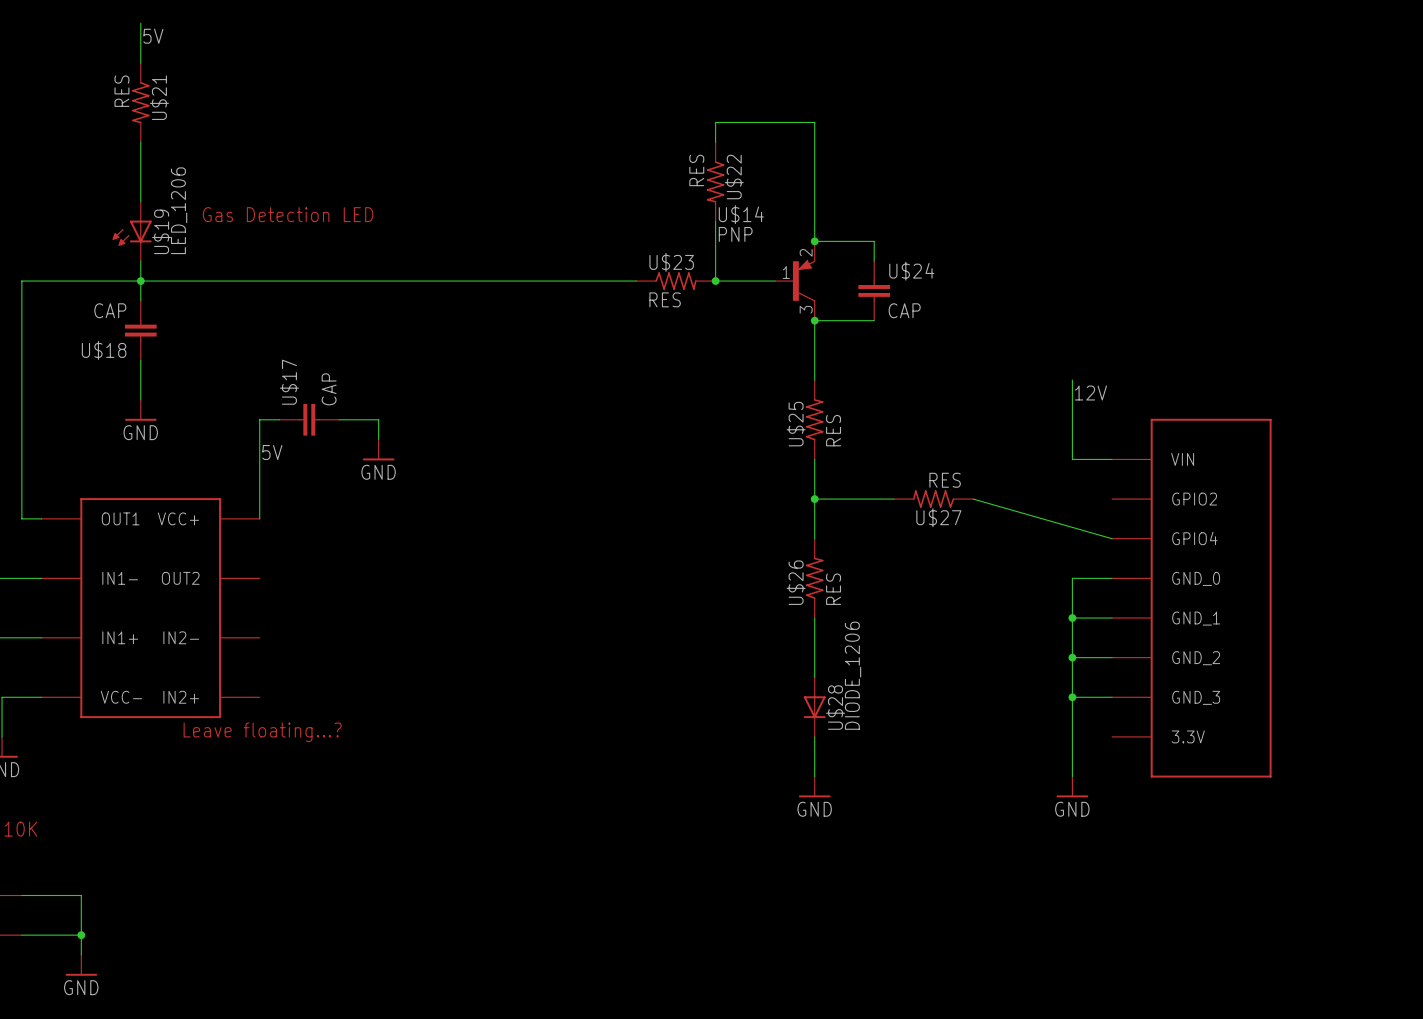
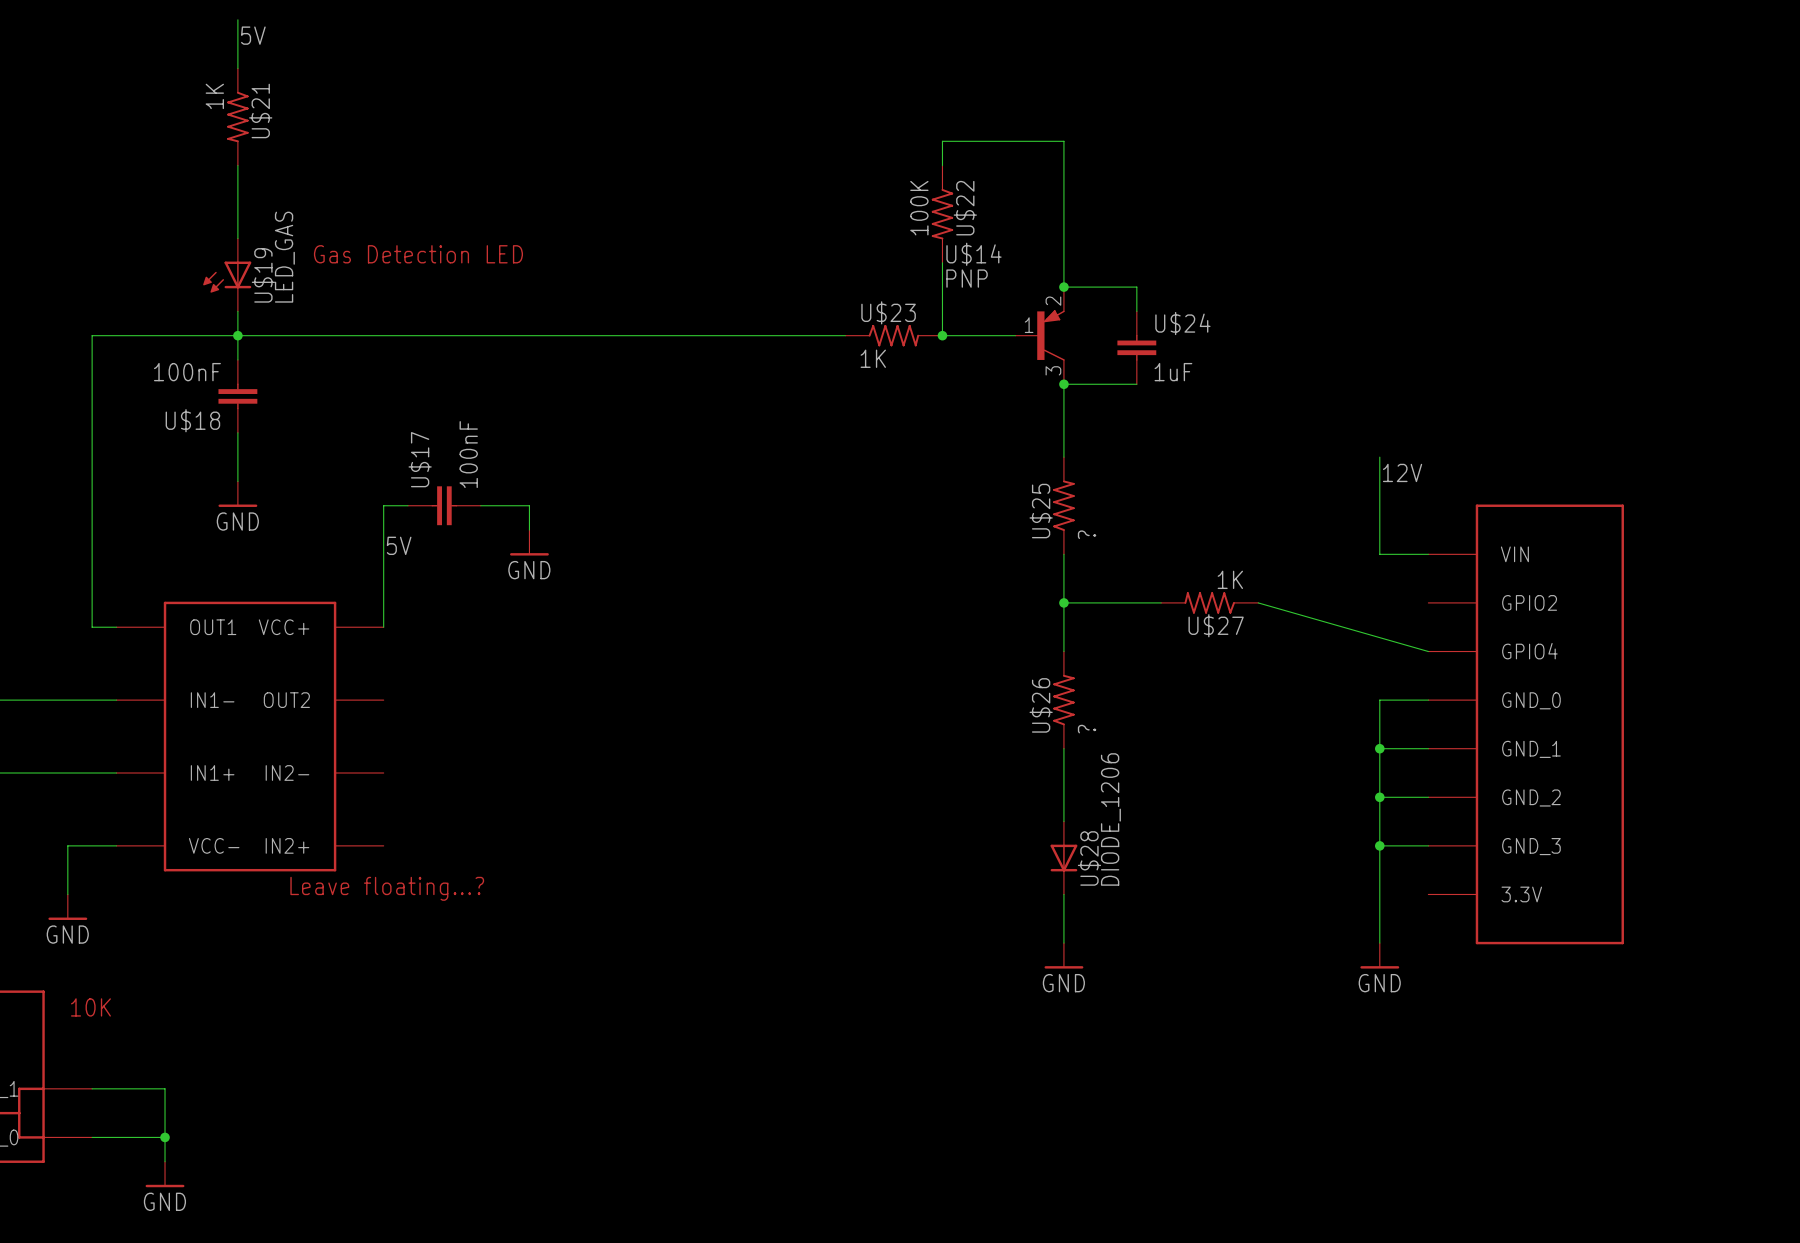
U$21 value: RES (121, 91) -> 1K (214, 96)
U$22 value: RES (696, 170) -> 100K (919, 208)
U$19 value: LED_1206 (179, 210) -> LED_GAS (284, 257)
U$23 value: RES (665, 299) -> 1K (873, 358)
U$18 value: CAP (110, 310) -> 100nF (187, 372)
U$24 value: CAP (904, 310) -> 1uF (1173, 372)
U$17 value: CAP (329, 389) -> 100nF (468, 454)
U$25 value: RES (833, 430) -> ? (1087, 534)
U$27 value: RES (945, 480) -> 1K (1230, 579)
U$26 value: RES (833, 589) -> ? (1087, 729)

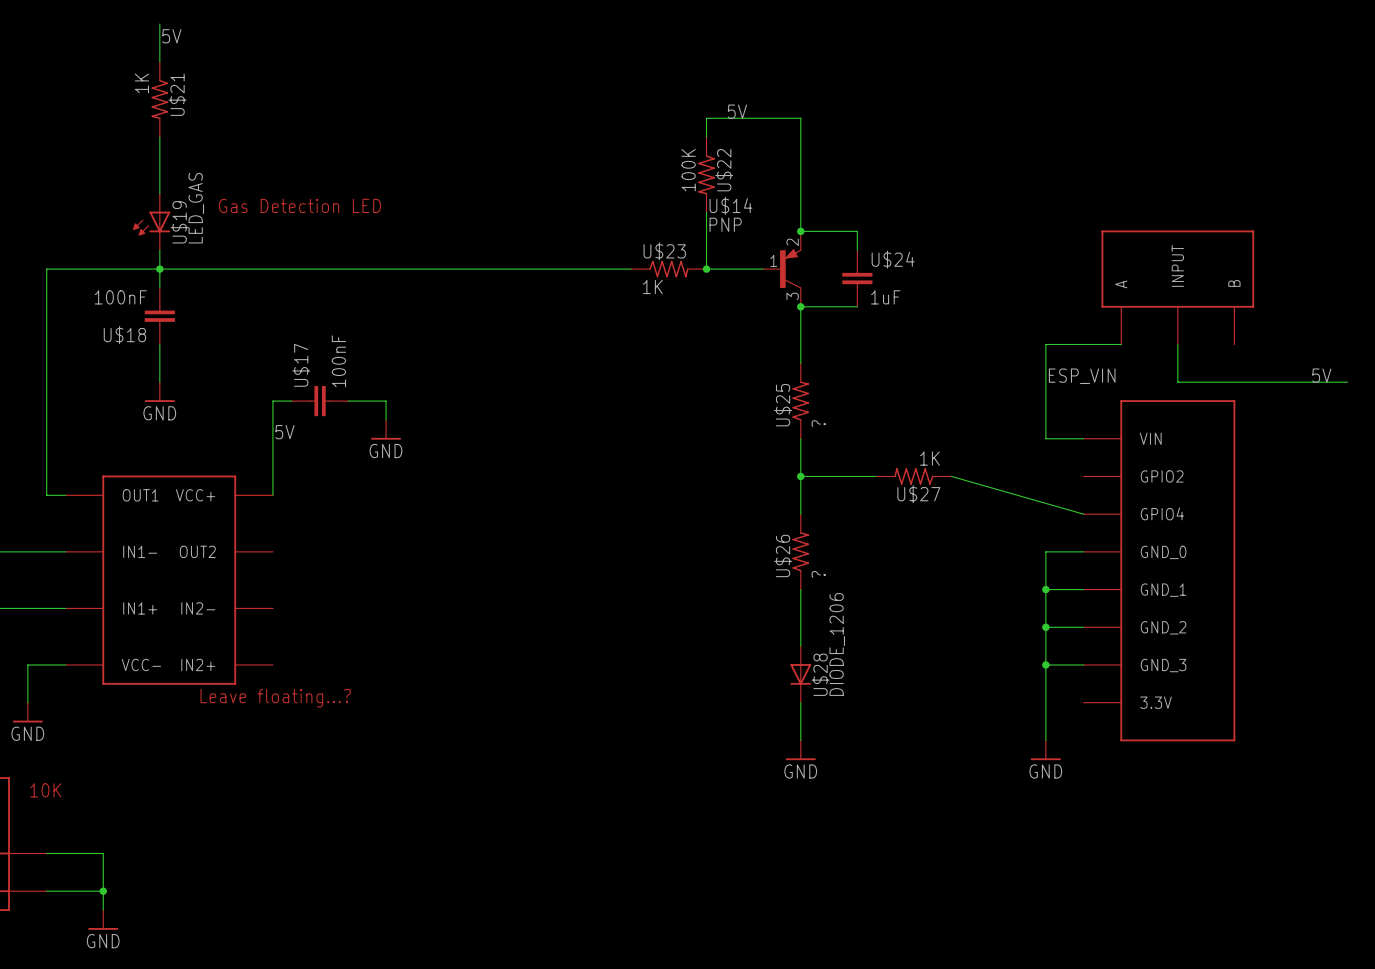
label: none -> 5V (737, 111)
part: none -> (1177, 287)
wire: none -> (1121, 344) (1045, 344) (1045, 363)
wire: none -> (1177, 344) (1177, 382) (1347, 382)
label: 12V (1402, 472) -> ESP_VIN (1082, 376)
label: none -> 5V (1321, 375)

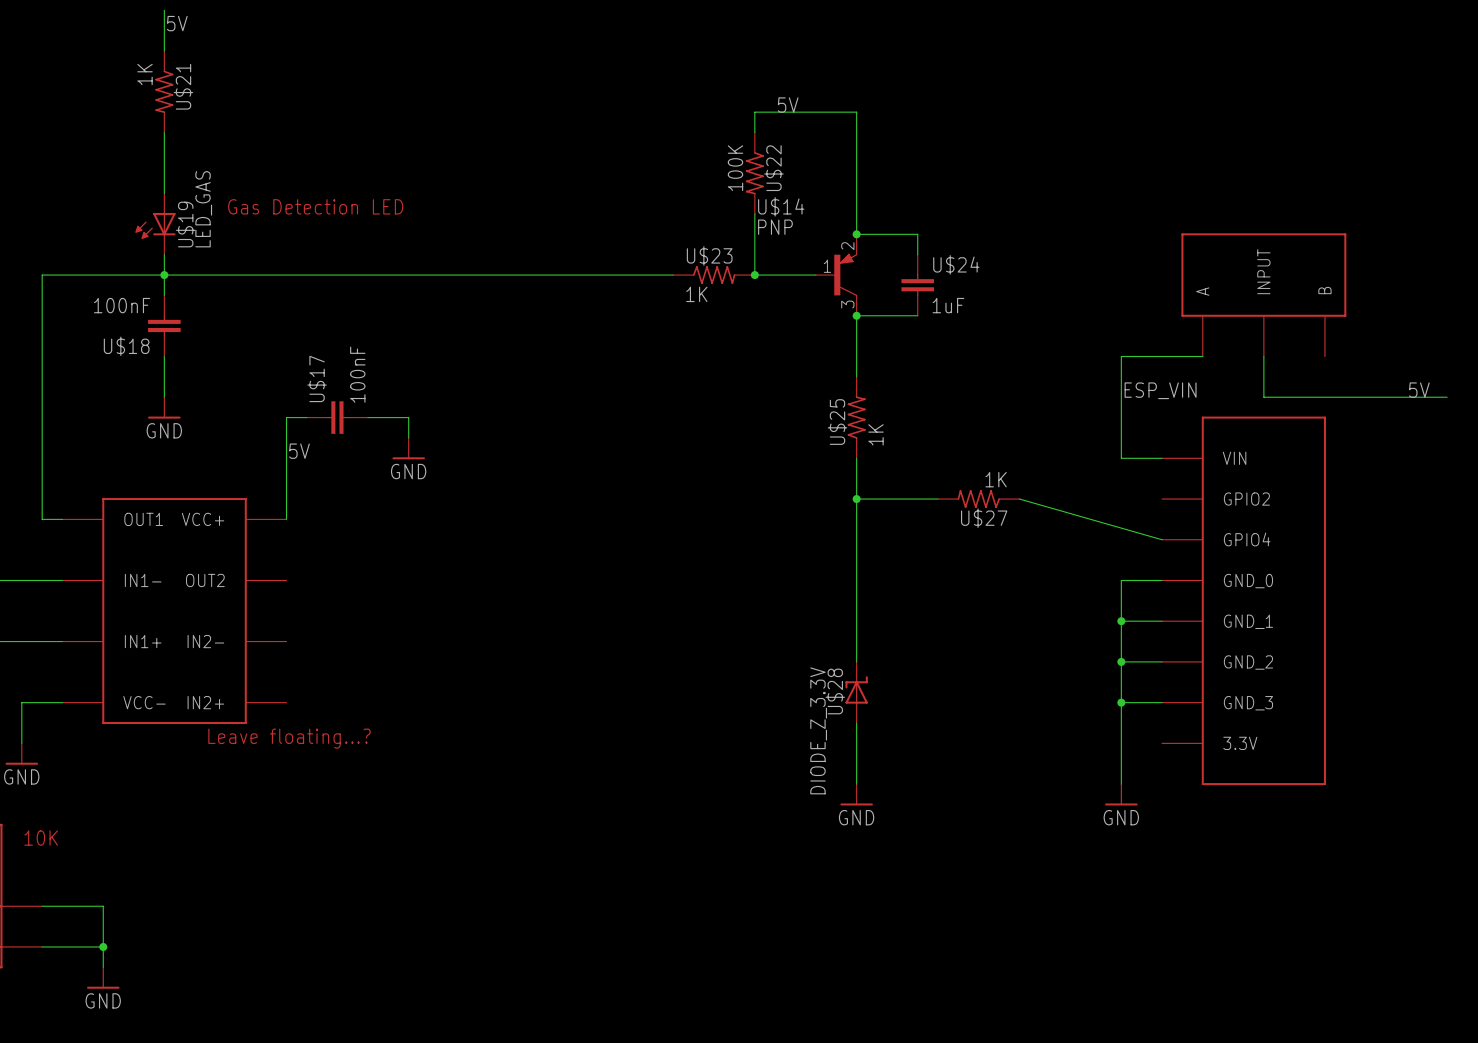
U$25 value: ? (818, 423) -> 1K (875, 434)
U$26: ? (800, 551) -> none
U$28 value: DIODE_1206 (837, 644) -> DIODE_Z_3.3V (818, 730)
U$28 symbol: [790, 646, 812, 703] -> [845, 661, 868, 724]
U$28 name position: U$28 (820, 674) -> U$28 (835, 691)

